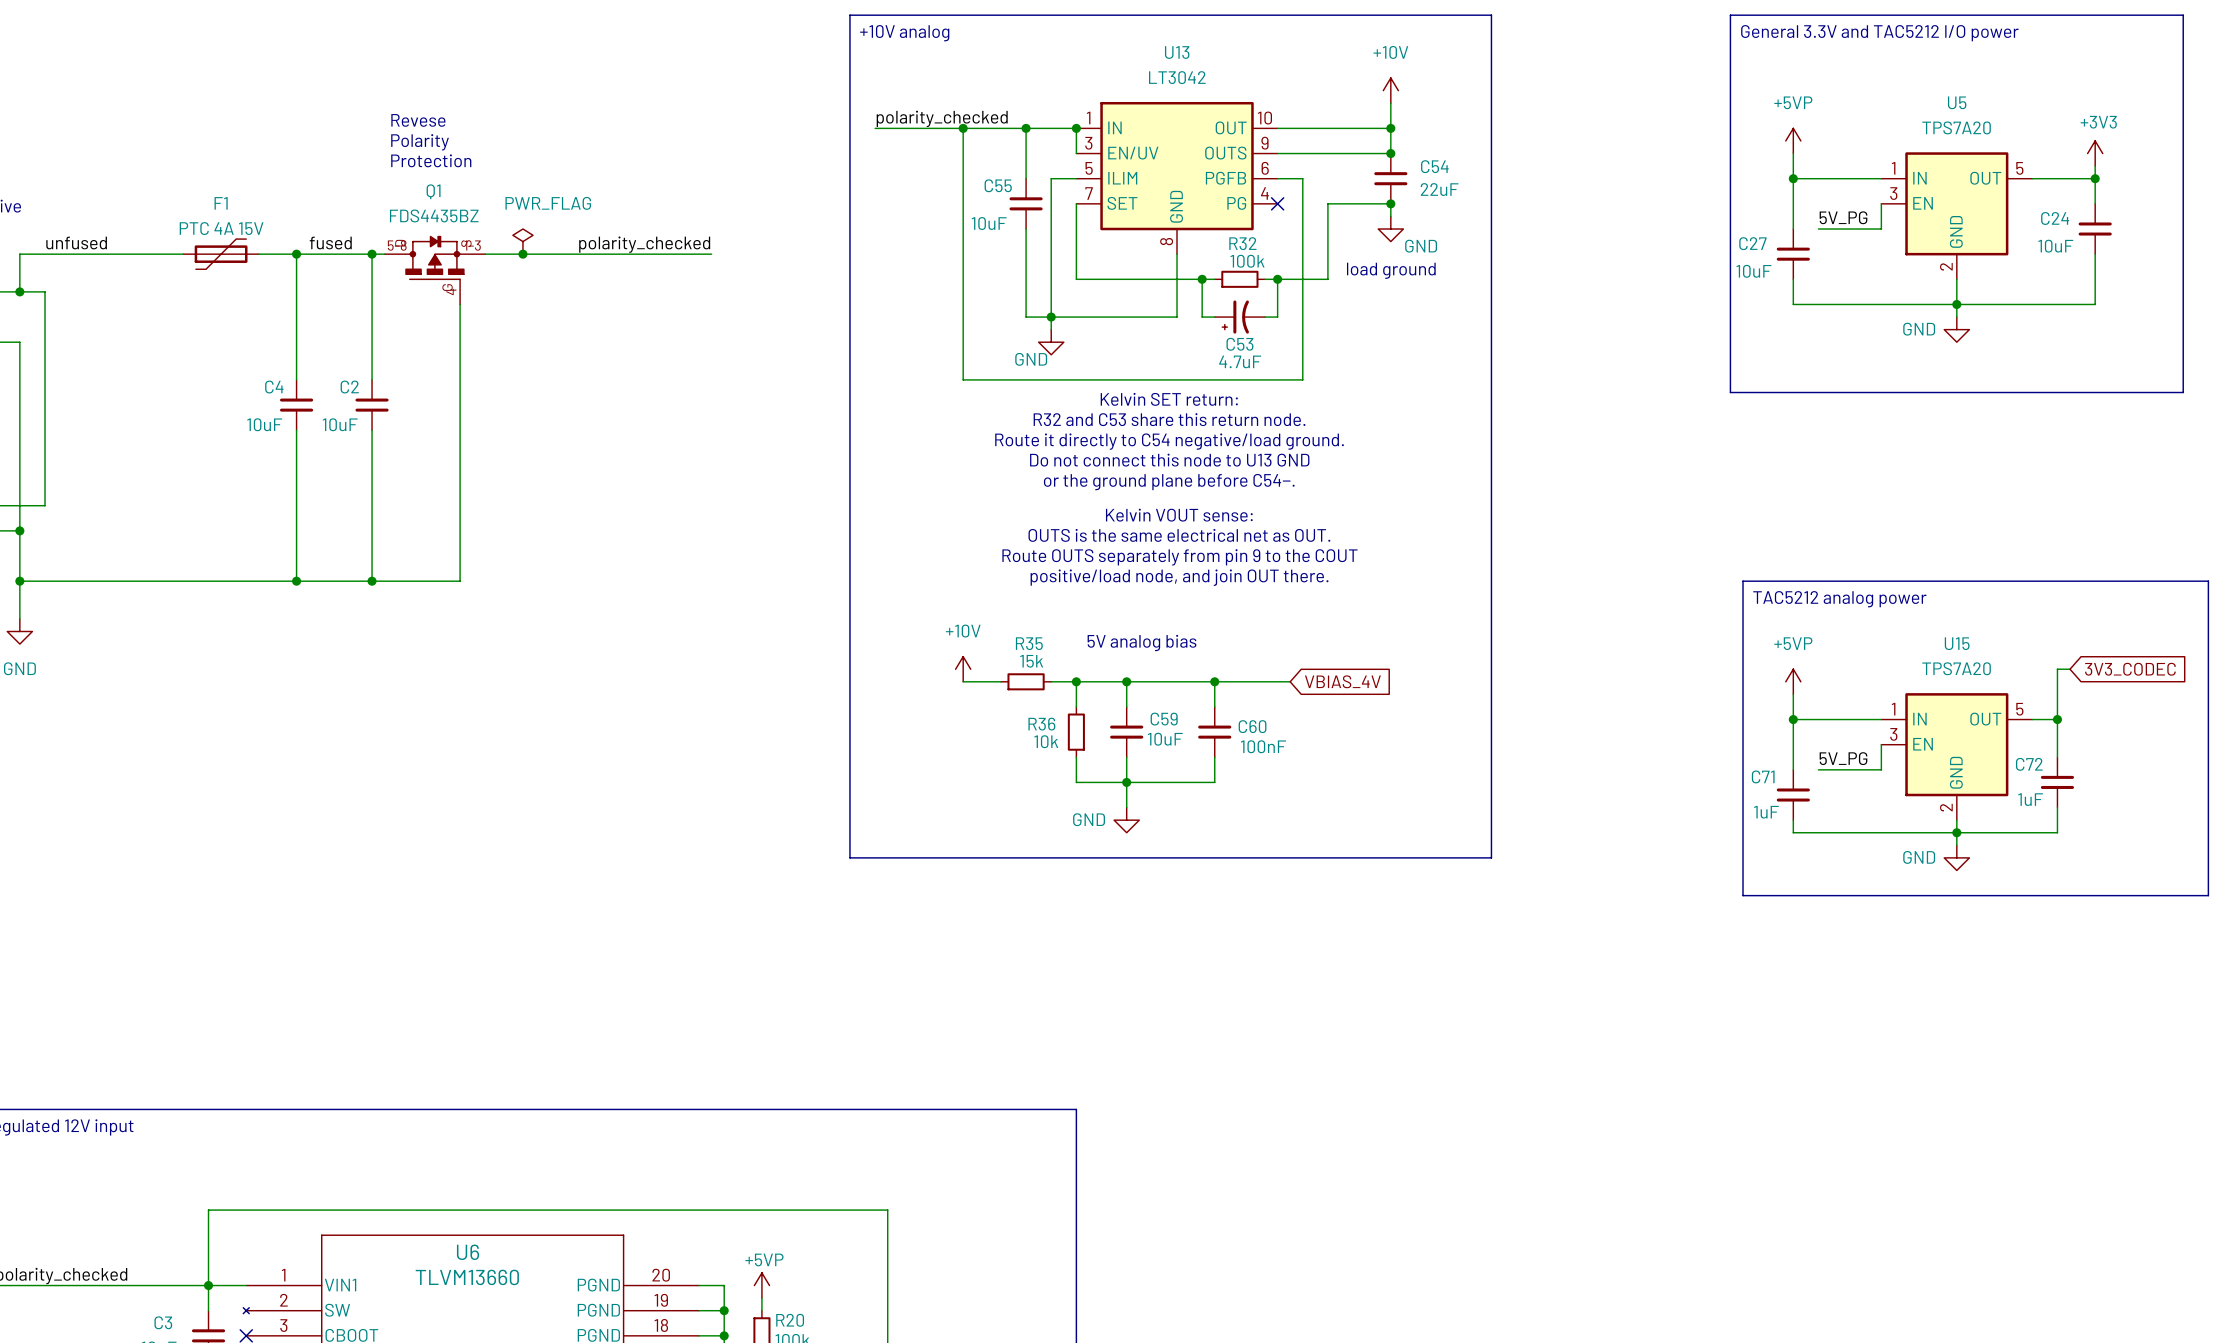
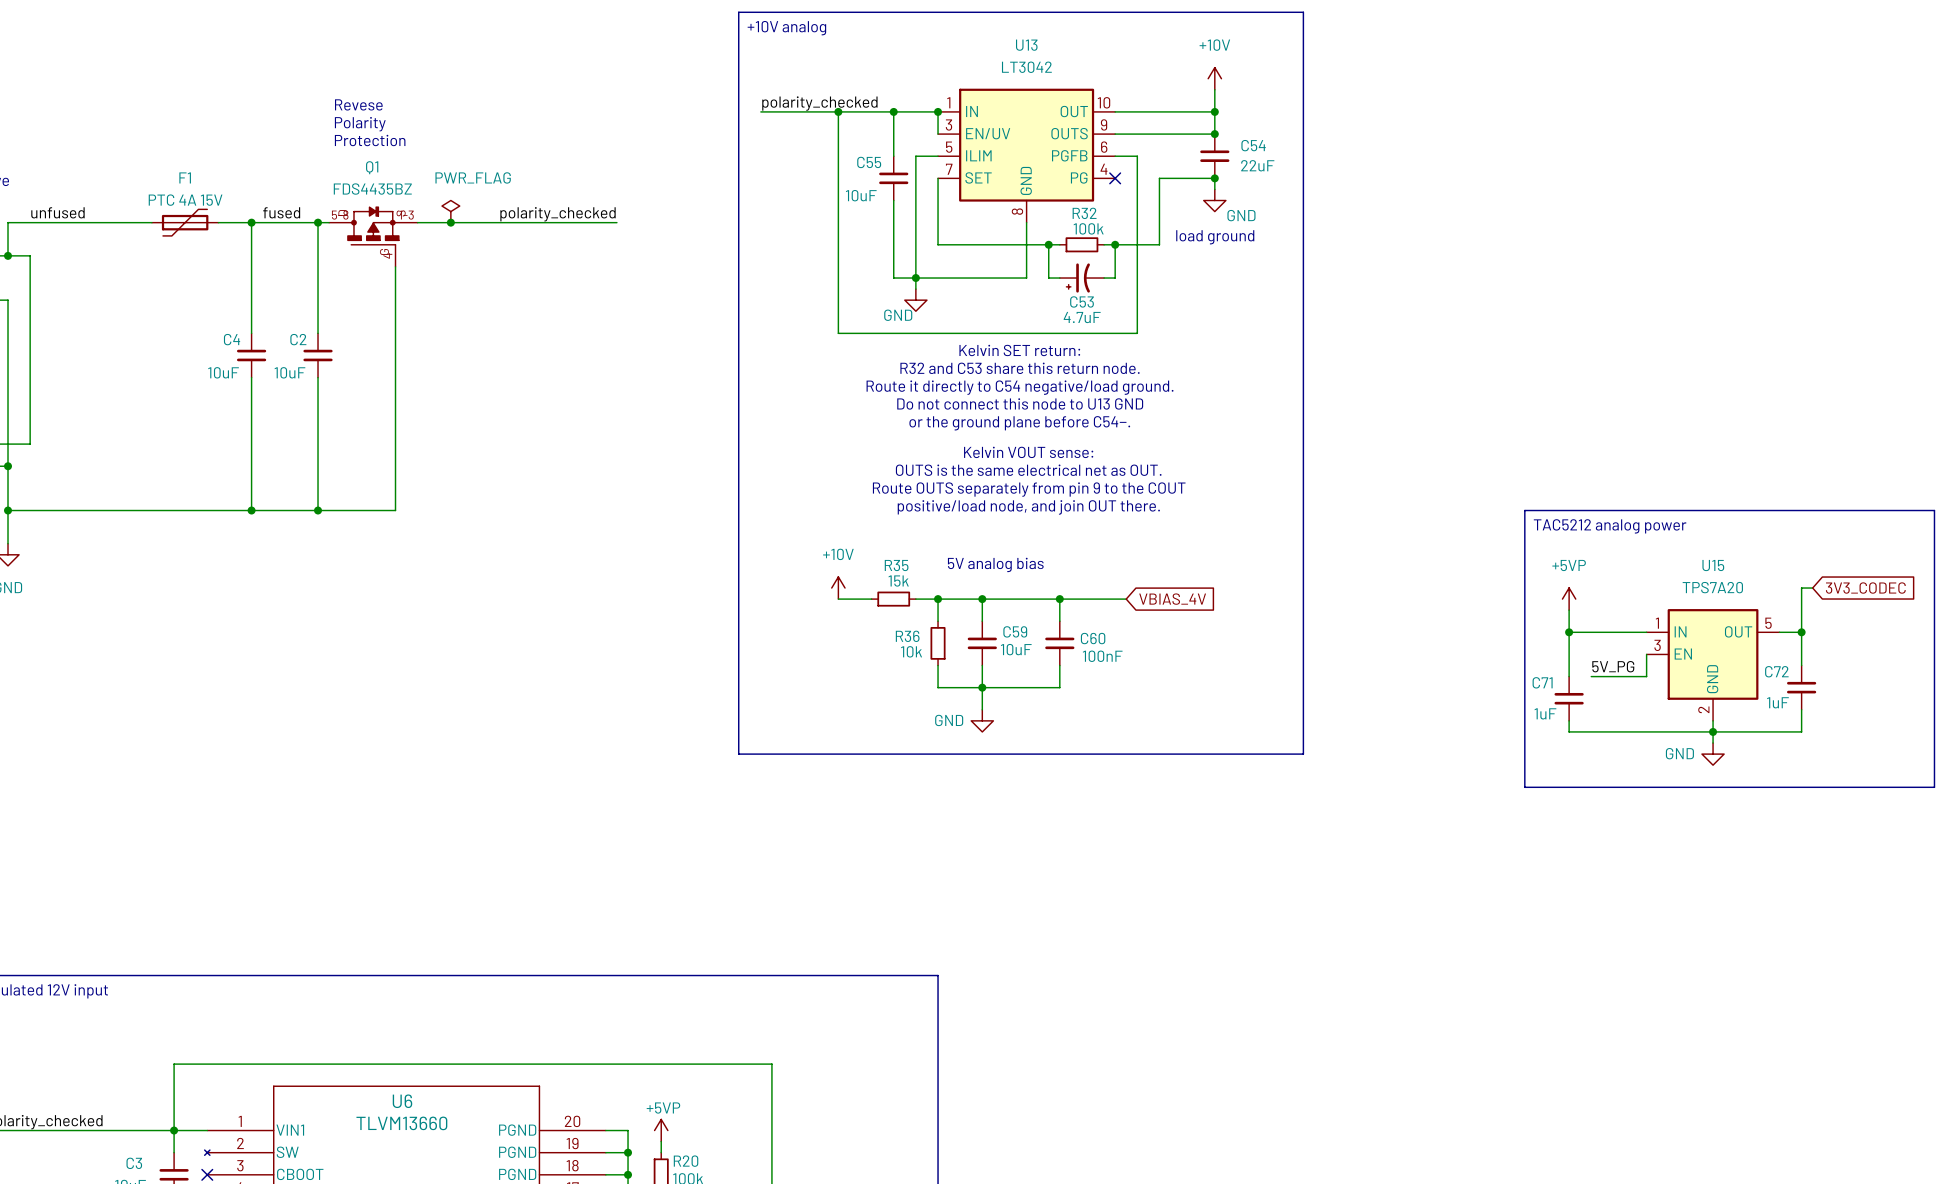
line: (1730, 15) (2183, 15) (2183, 392) (1730, 392) (1730, 15) -> none
text: General 3.3V and TAC5212 I/O power (1879, 33) -> none
power symbol: +5VP (1793, 140) -> none
wire: (1793, 153) (1793, 229) -> none
power symbol: +3V3 (2095, 153) -> none
wire: (2095, 166) (2095, 203) -> none
wire: (1793, 178) (1881, 178) -> none
junction: (1793, 178) -> none
wire: (2032, 178) (2095, 178) -> none
junction: (2095, 178) -> none
wire: (1881, 203) (1881, 229) (1818, 229) -> none
U5: TPS7A20 (1956, 215) -> none
label: 5V_PG (1843, 217) -> none
C24: 10uF (2095, 229) -> none
C27: 10uF (1793, 254) -> none
wire: (2095, 254) (2095, 304) (1793, 304) (1793, 279) -> none
wire: (1956, 279) (1956, 317) -> none
junction: (1956, 304) -> none
power symbol: GND (1956, 329) -> none

